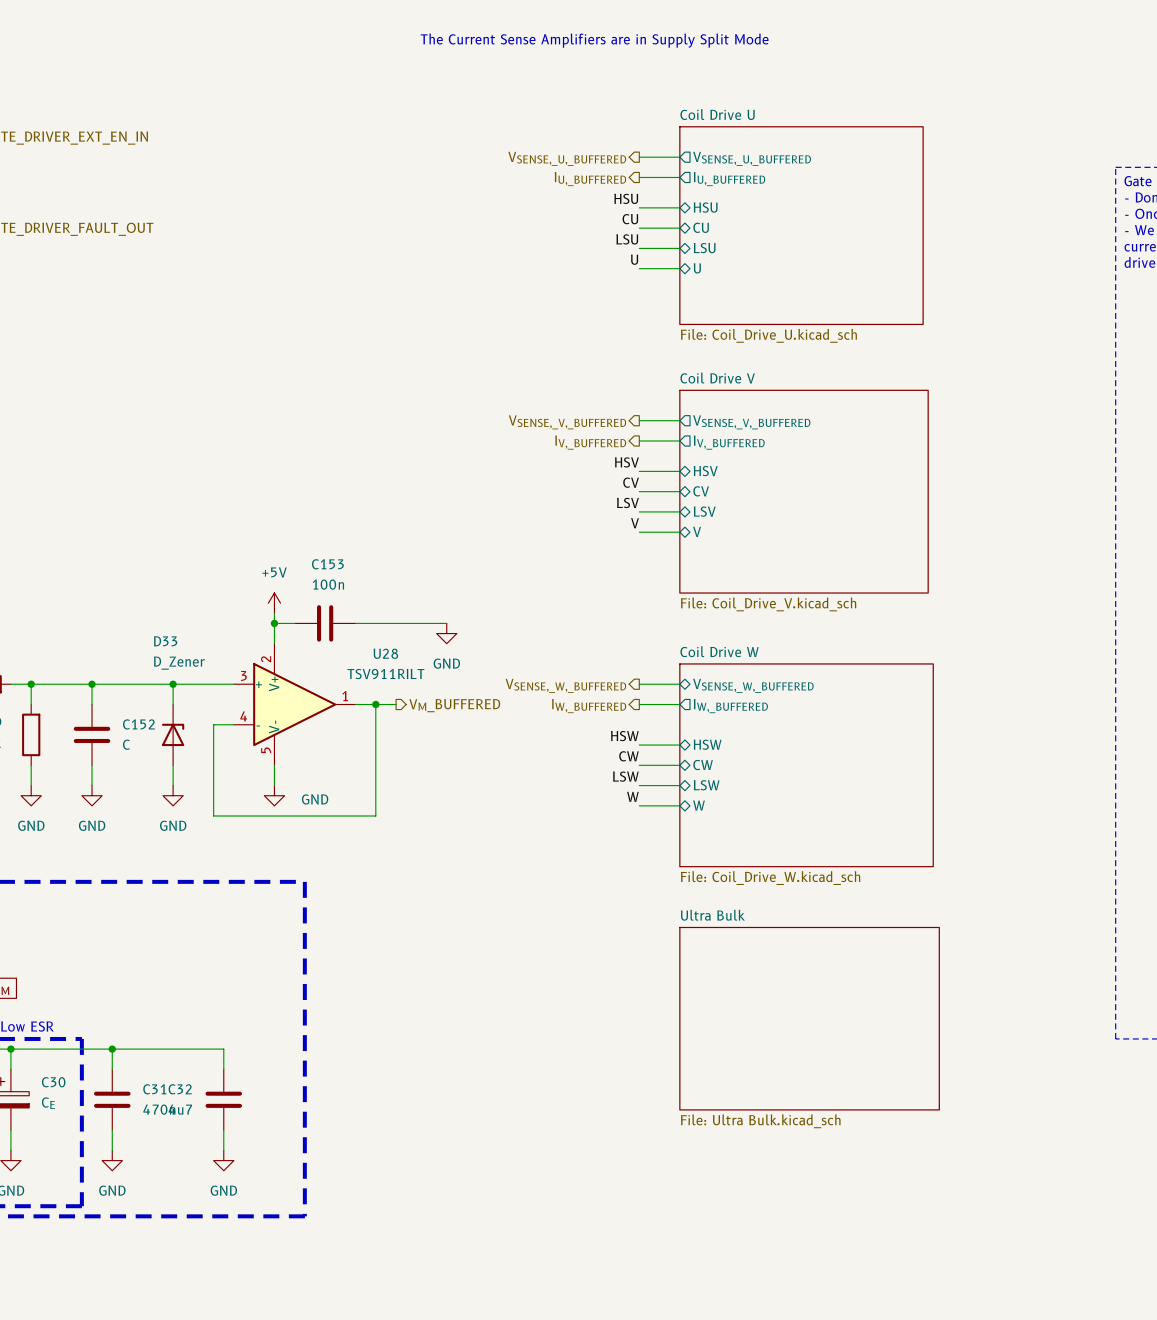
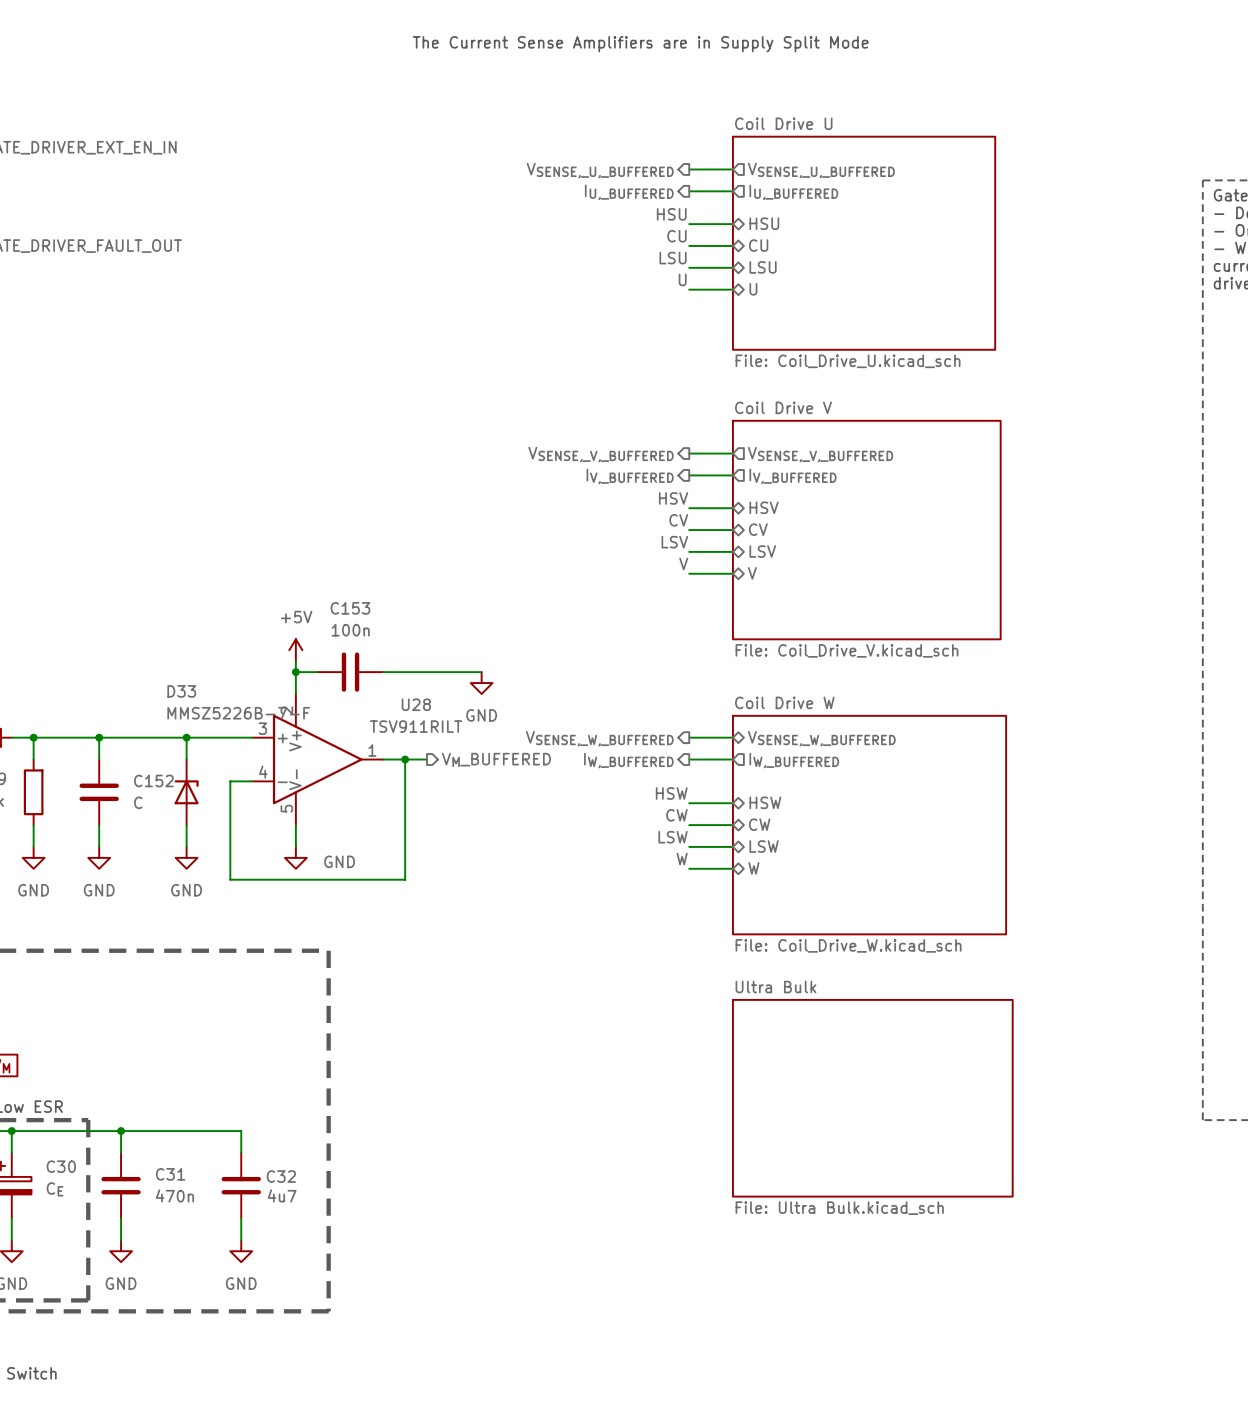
D33 value: D_Zener (179, 663) -> MMSZ5226B-7-F (238, 713)
C32 name position: C32 (180, 1089) -> C32 (281, 1176)
C32 value position: 4u7 (180, 1109) -> 4u7 (282, 1195)

